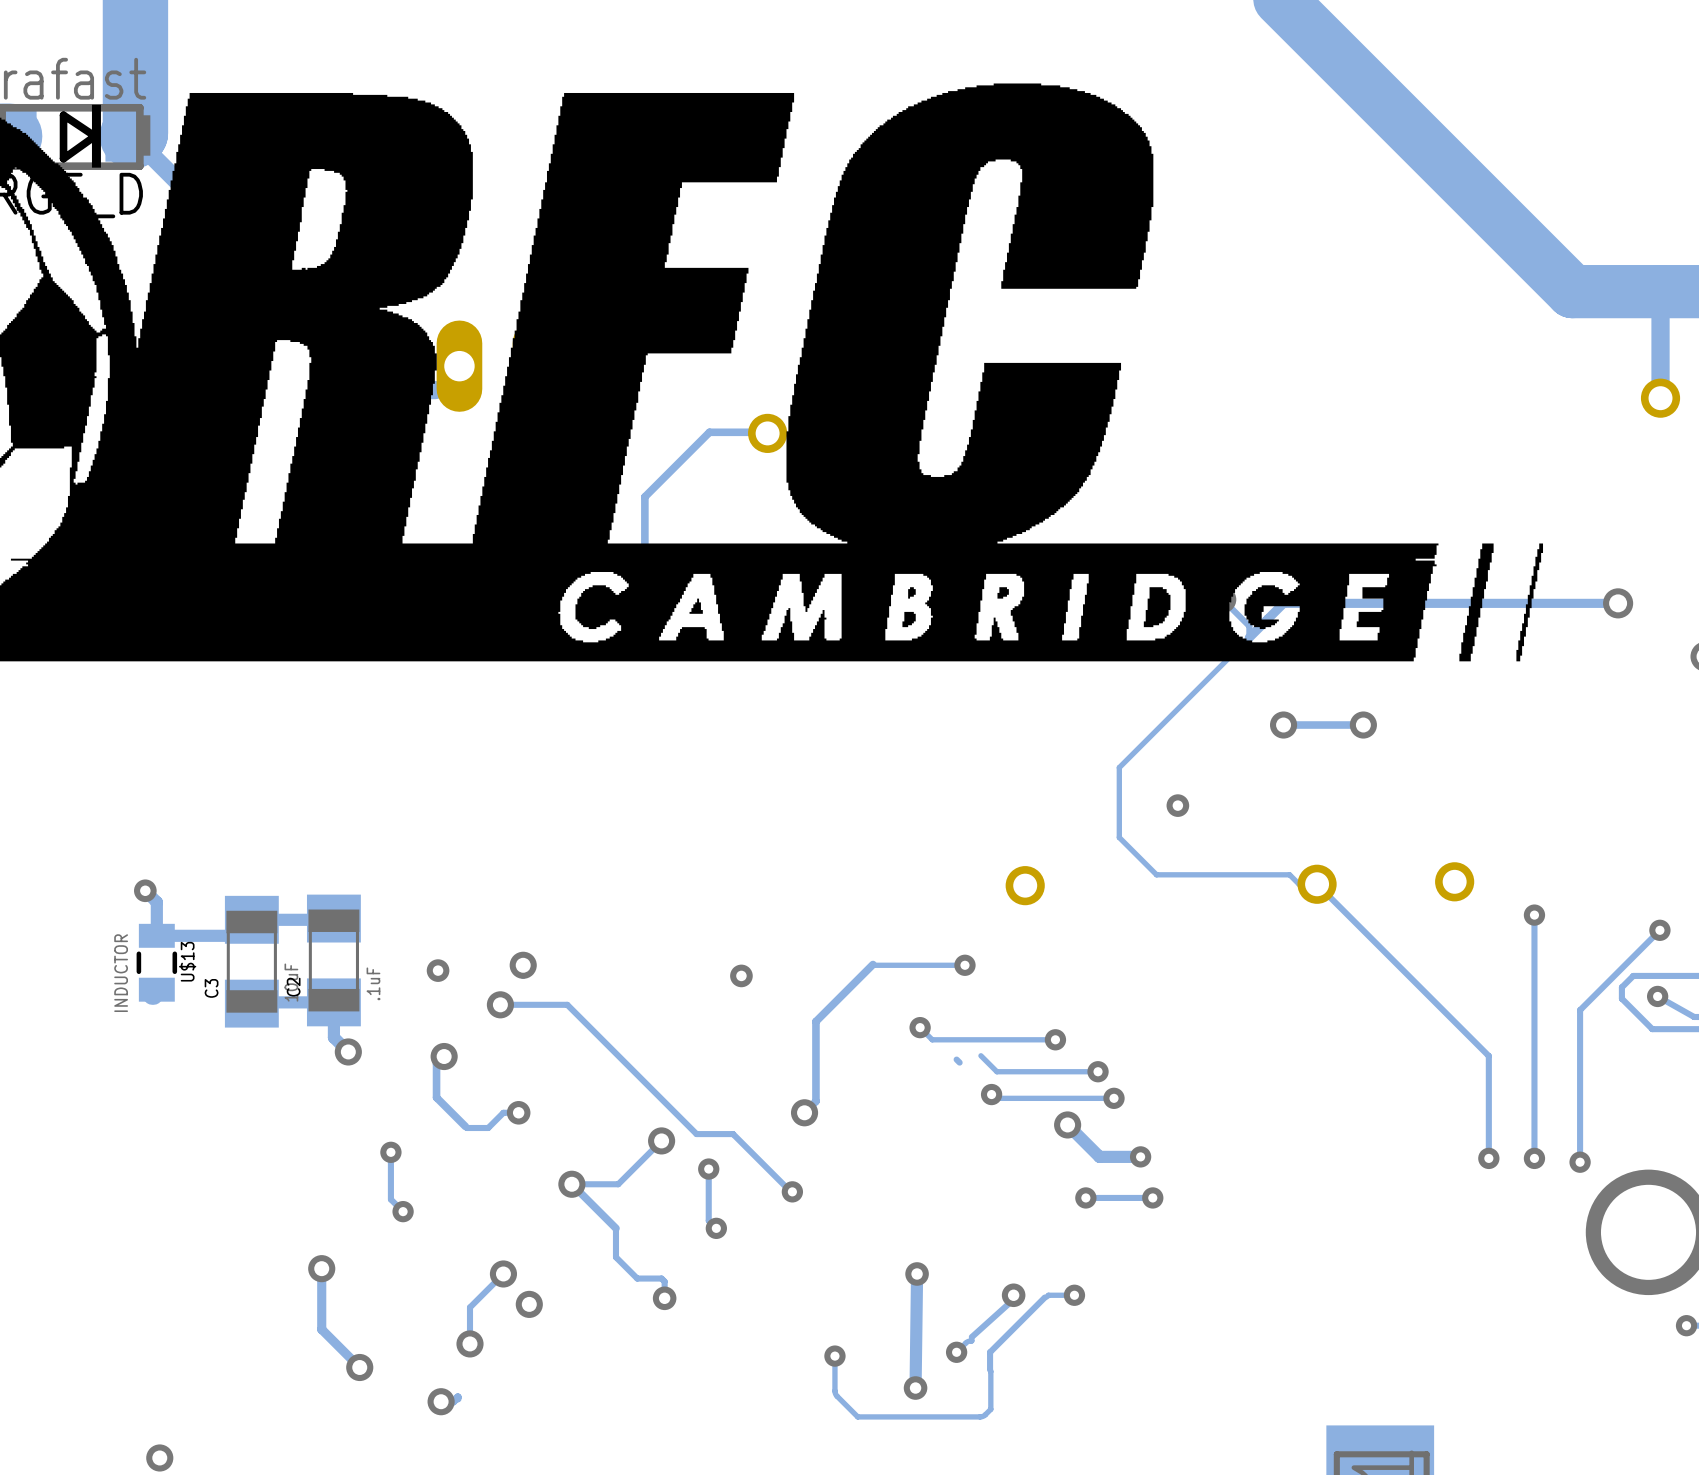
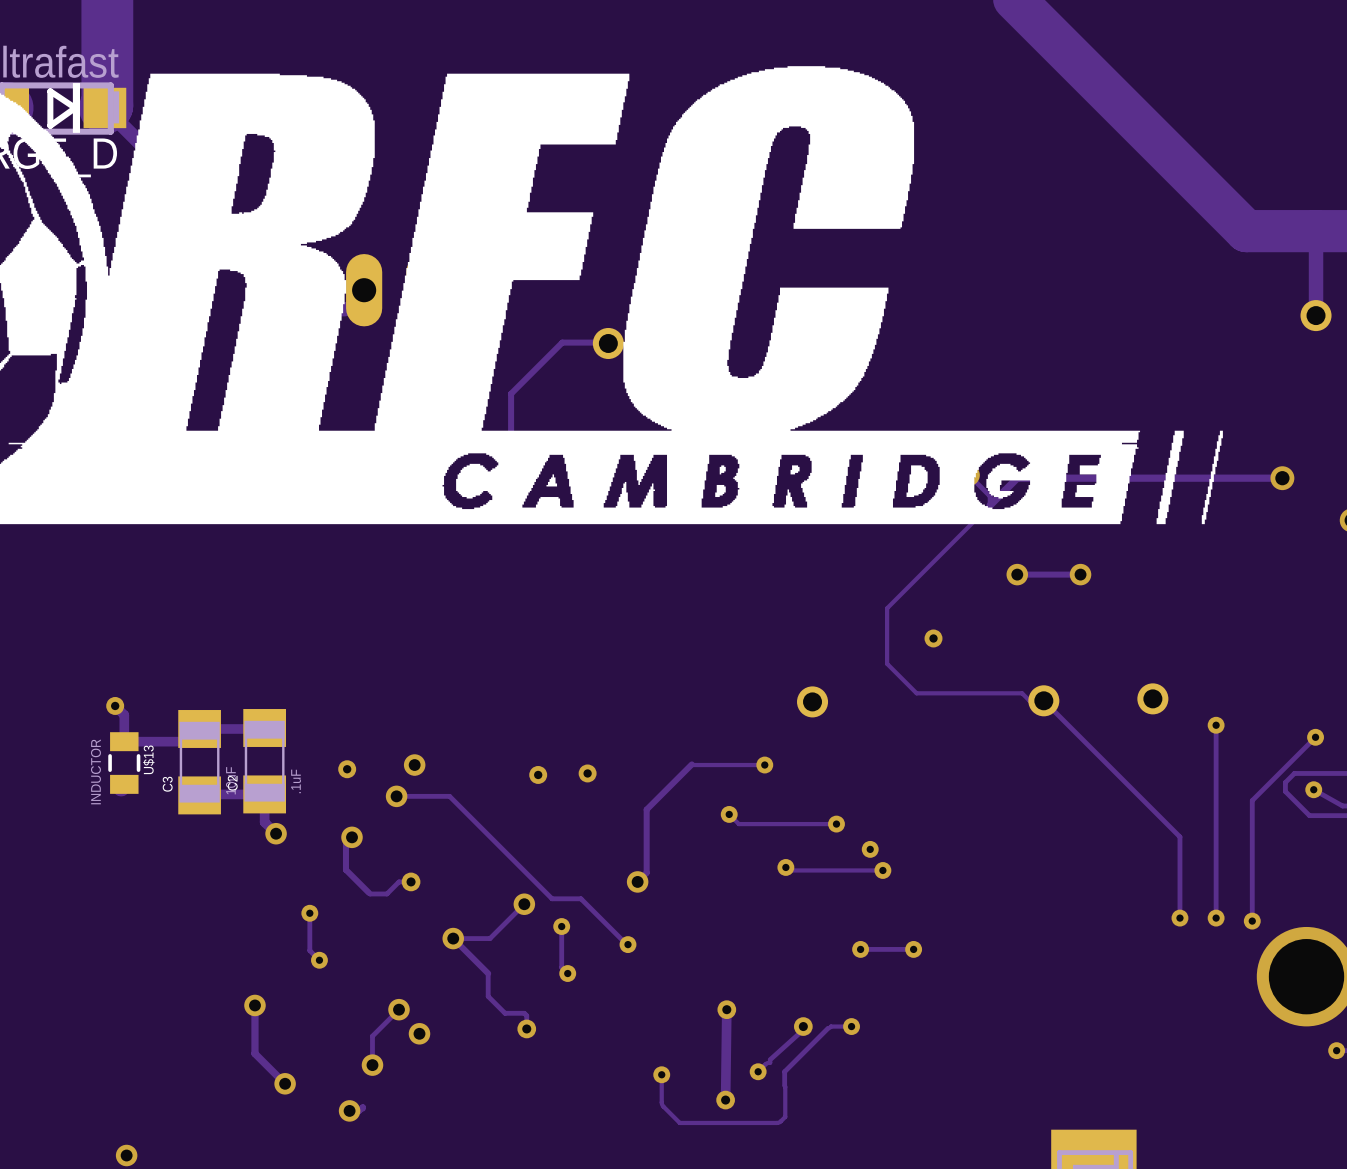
via: none -> (538, 774)
track: (980, 1055) (996, 1071) (1098, 1071) -> none
track: (956, 1059) (959, 1062) -> none
track: (1067, 1124) (1099, 1156) (1140, 1156) -> none
via: (1067, 1124) -> none
via: (1140, 1156) -> none

